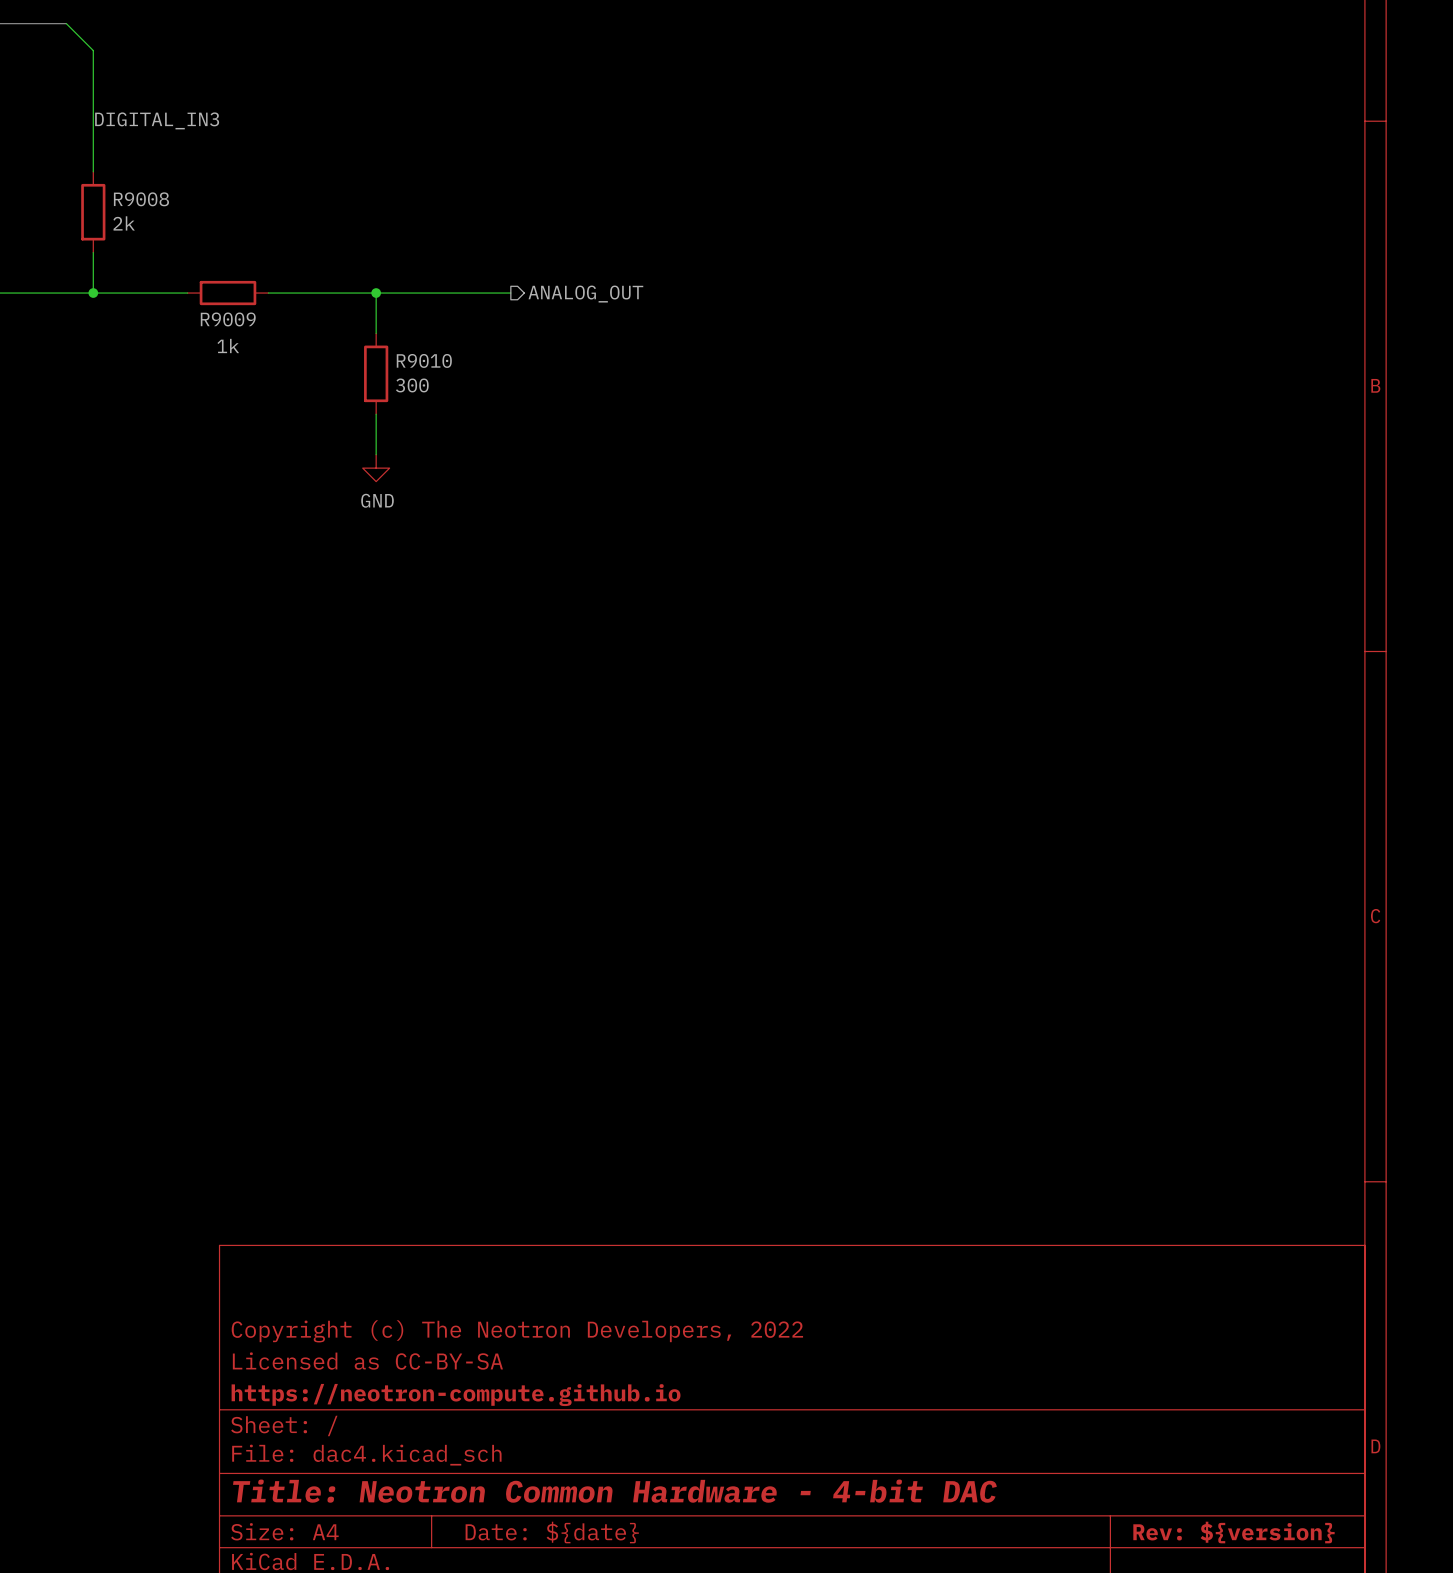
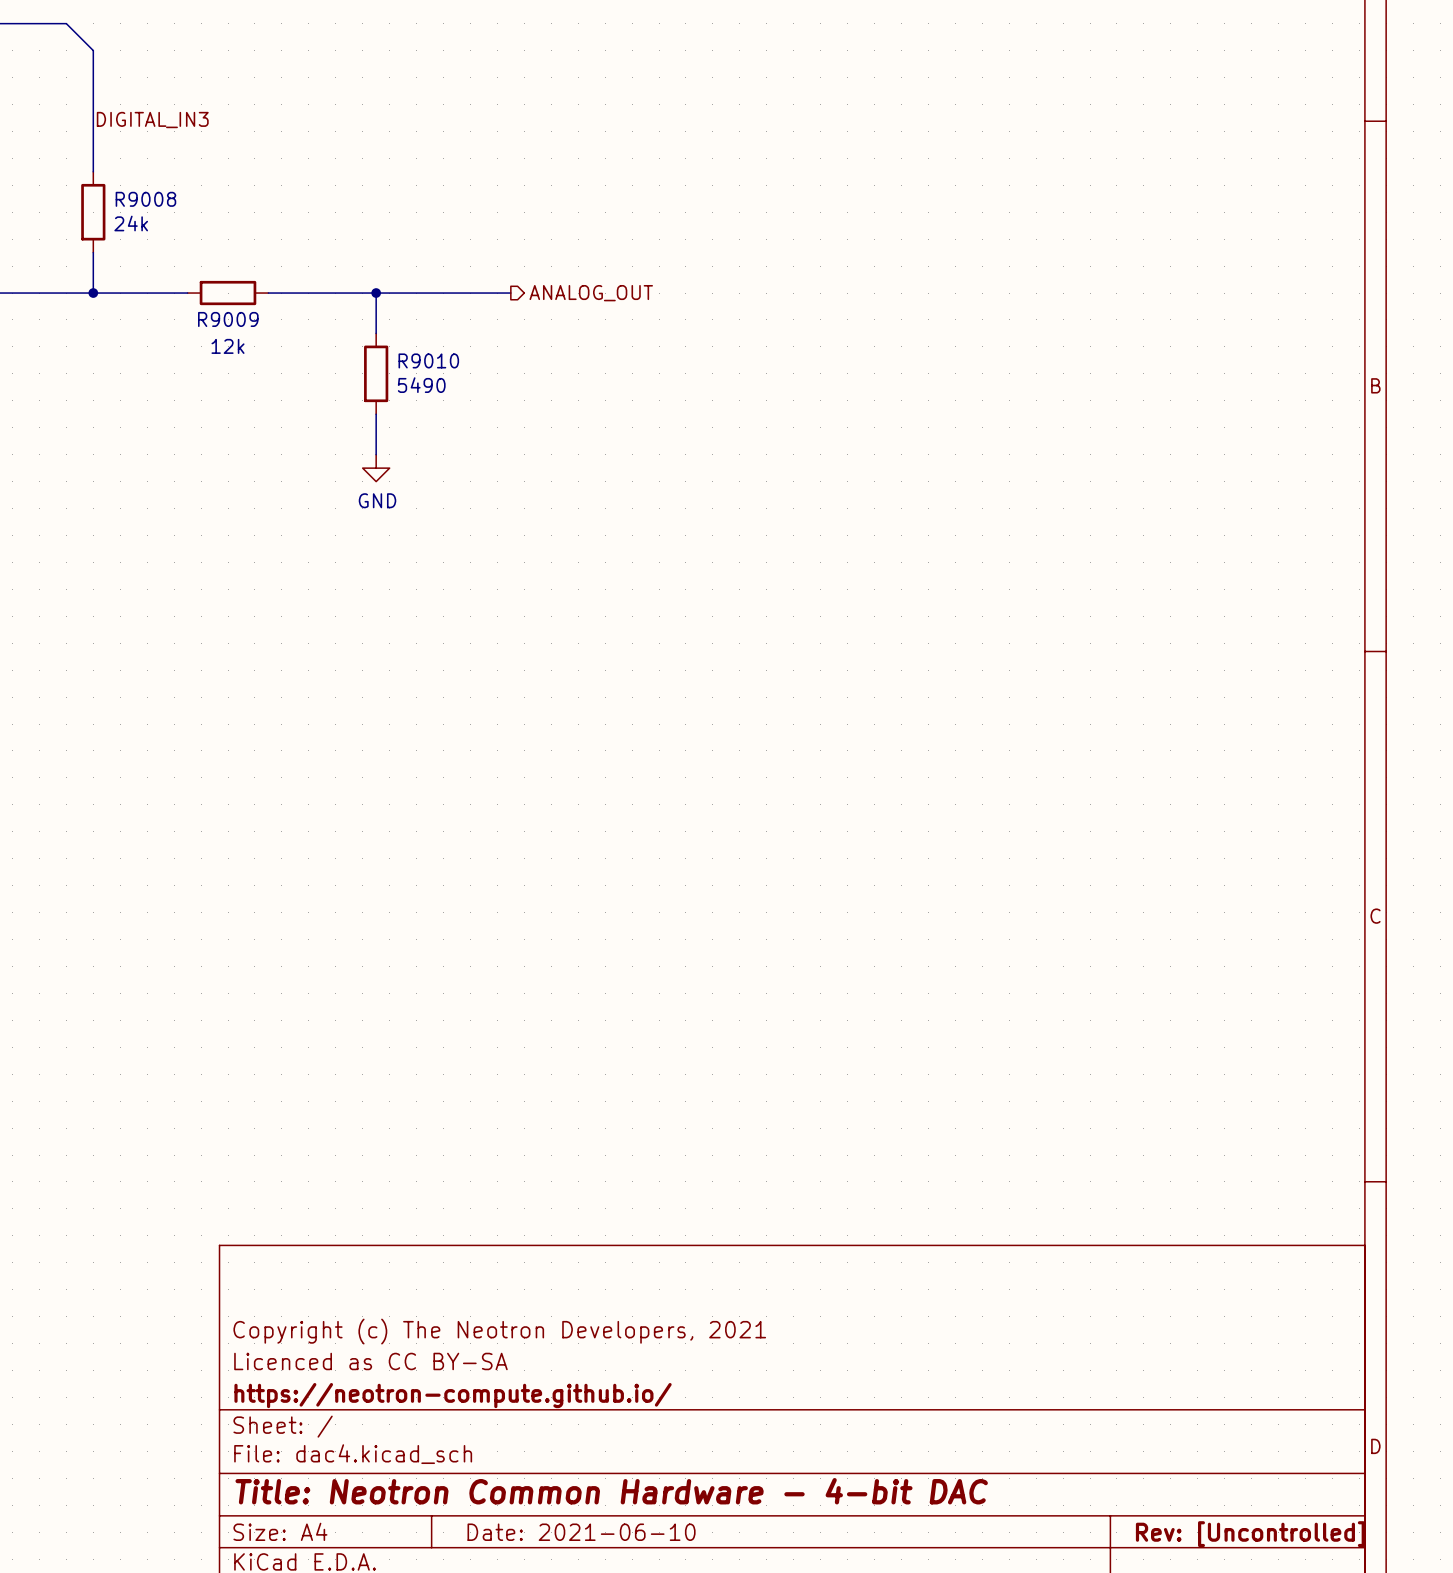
R9008 value: 2k (124, 223) -> 24k (131, 223)
R9009 value: 1k (228, 345) -> 12k (228, 346)
R9010 value: 300 (412, 385) -> 5490 (421, 385)
title block: Copyright (c) The Neotron Developers, 2022 (517, 1331) -> Copyright (c) The Neotron Developers, 2021 (499, 1331)
title block: Licensed as CC-BY-SA (367, 1361) -> Licenced as CC BY-SA (370, 1361)
title block: https://neotron-compute.github.io (456, 1395) -> https://neotron-compute.github.io/ (453, 1395)
title block: Date: ${date} (552, 1532) -> Date: 2021-06-10 (581, 1532)
title block: Rev: ${version} (1233, 1532) -> Rev: [Uncontrolled] (1250, 1534)

